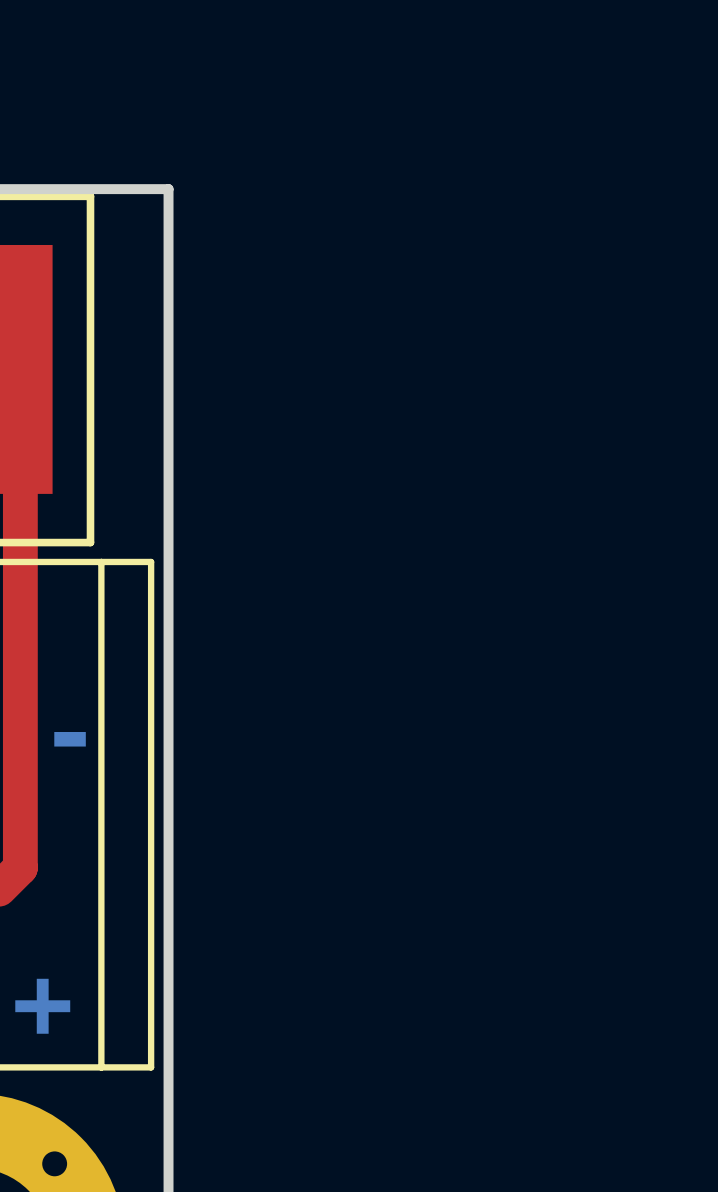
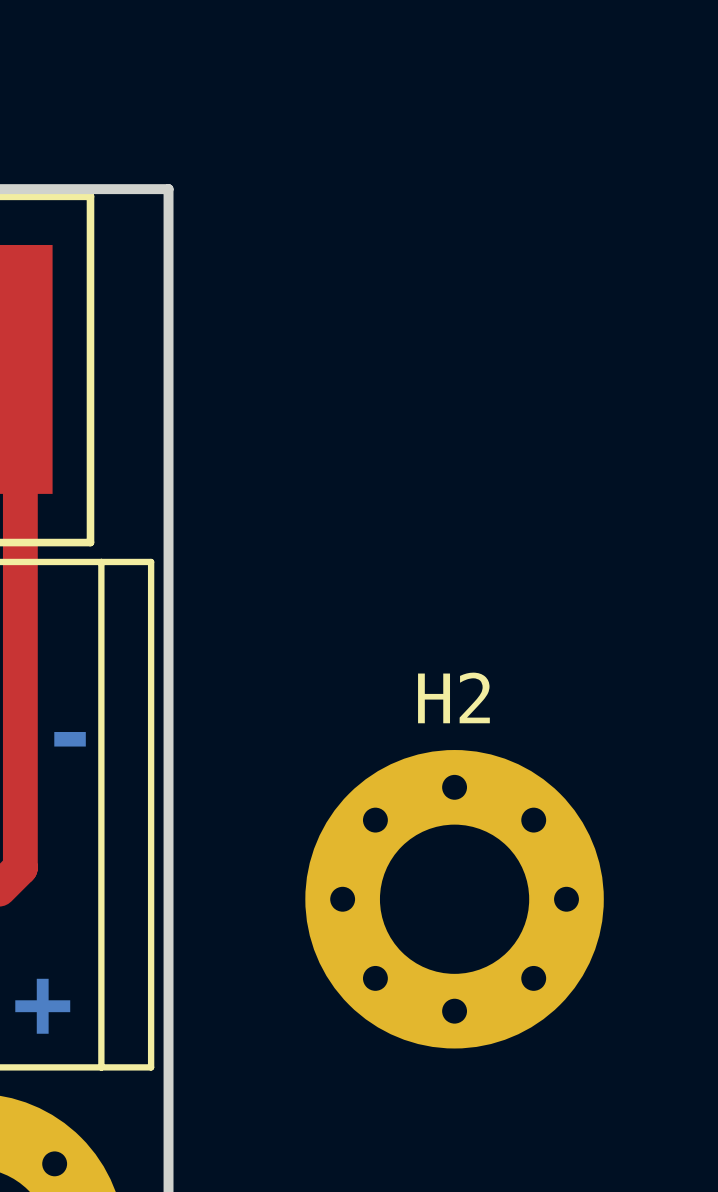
H2: none -> (454, 899)

